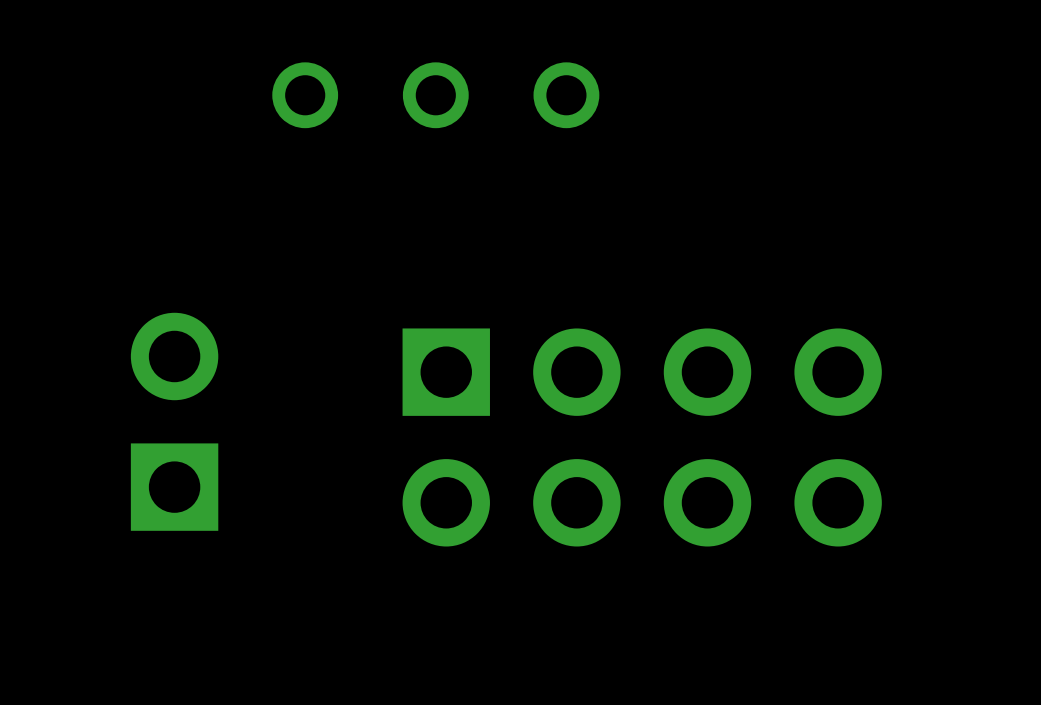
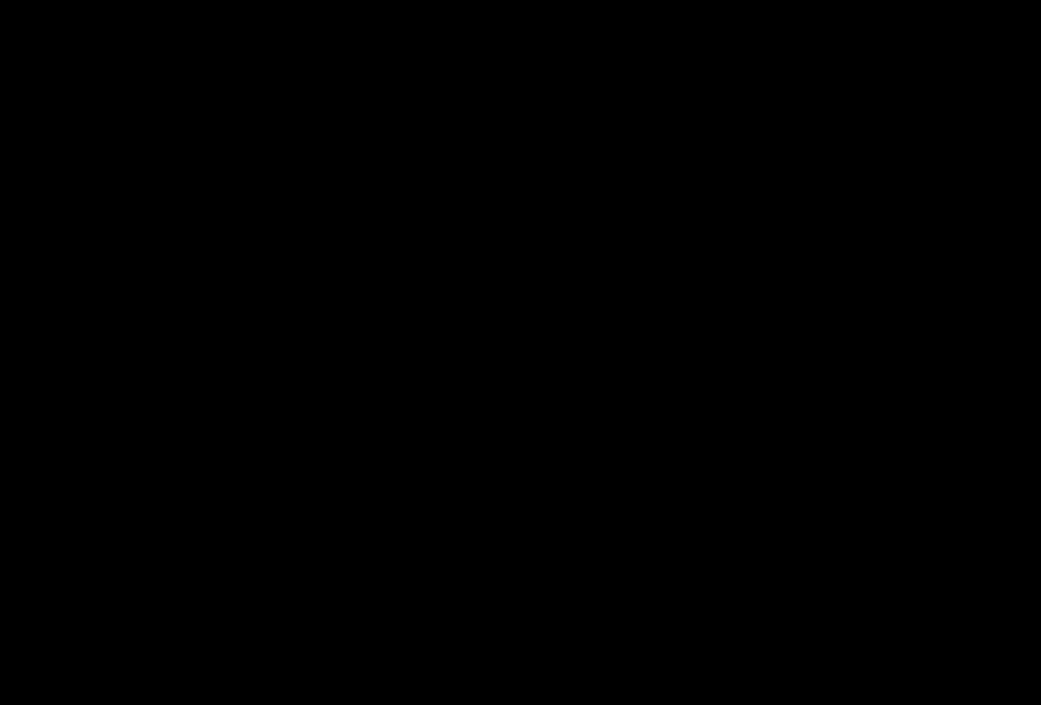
part: (435, 95) -> none
part: (174, 421) -> none
part: (642, 437) -> none

